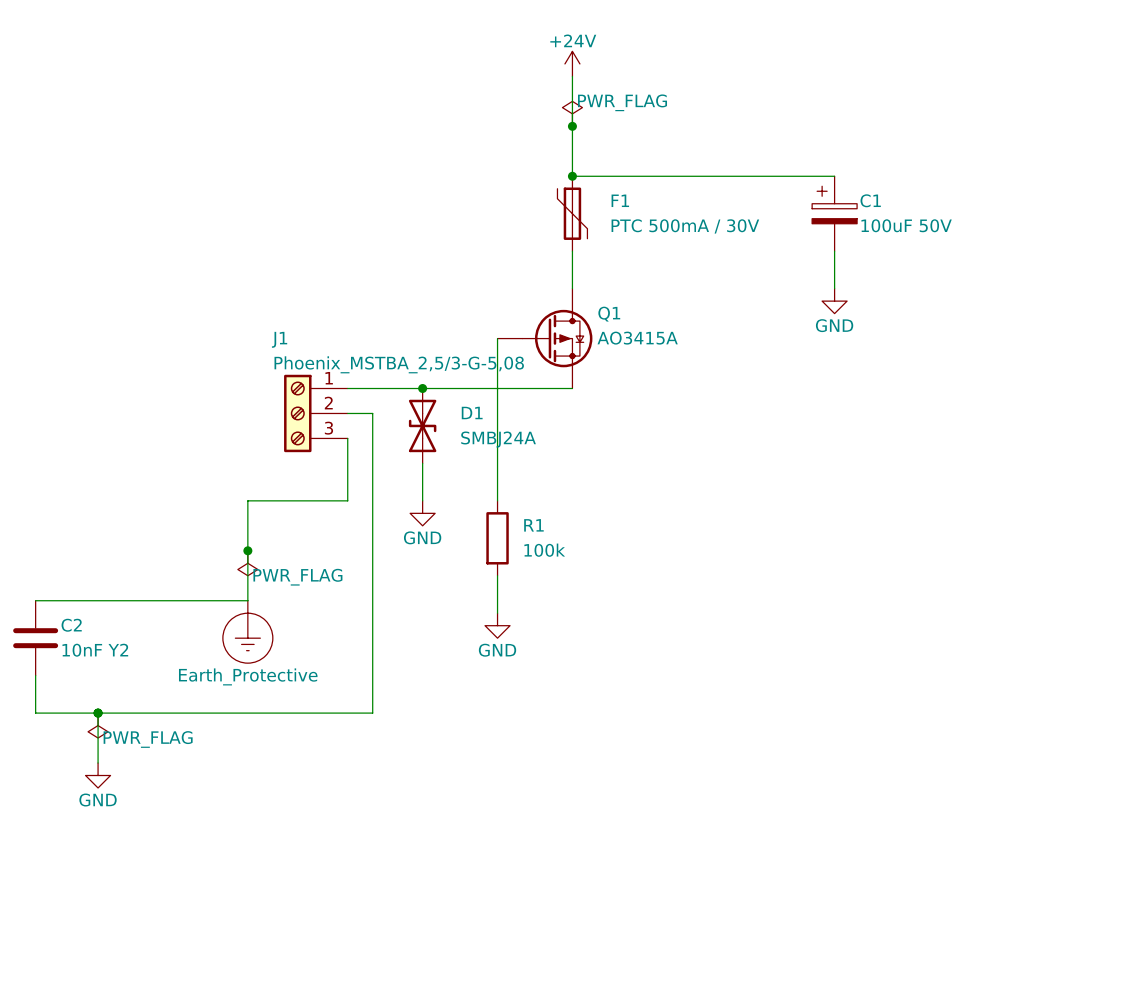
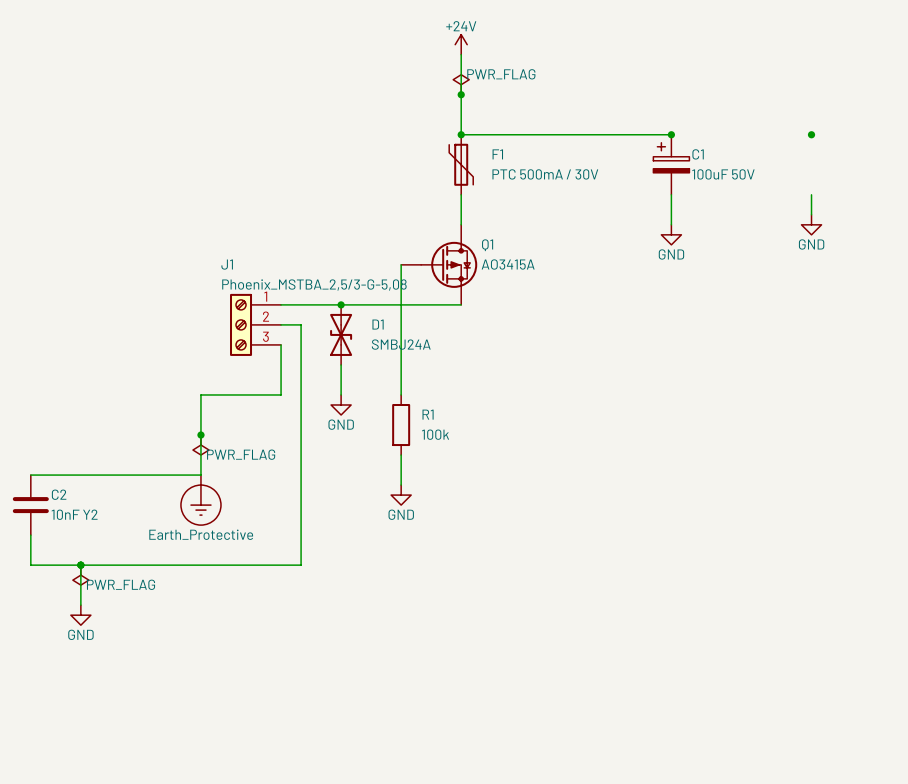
junction: none -> (671, 134)
junction: none -> (811, 134)
wire: none -> (811, 194) (811, 214)
power symbol: none -> GND (811, 224)

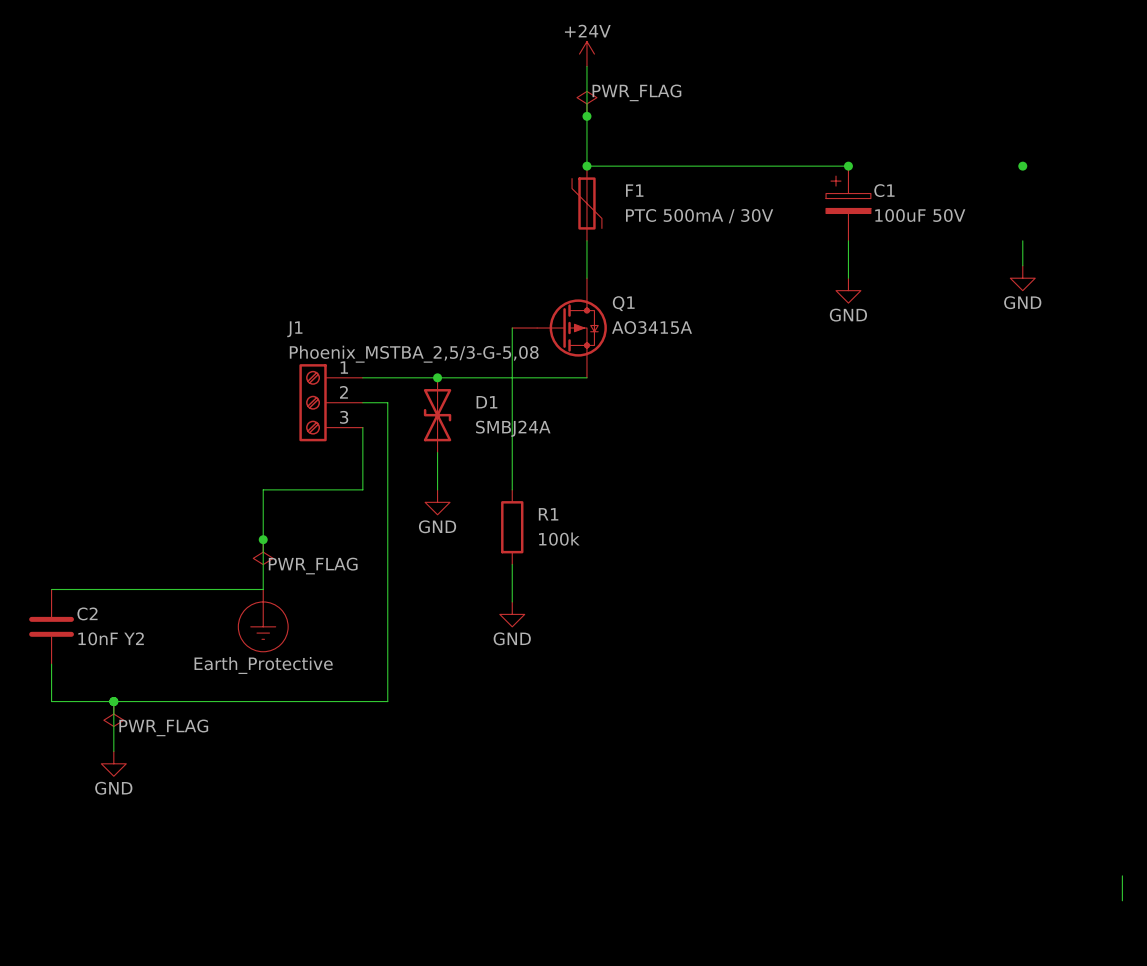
wire: none -> (1122, 875) (1122, 900)

